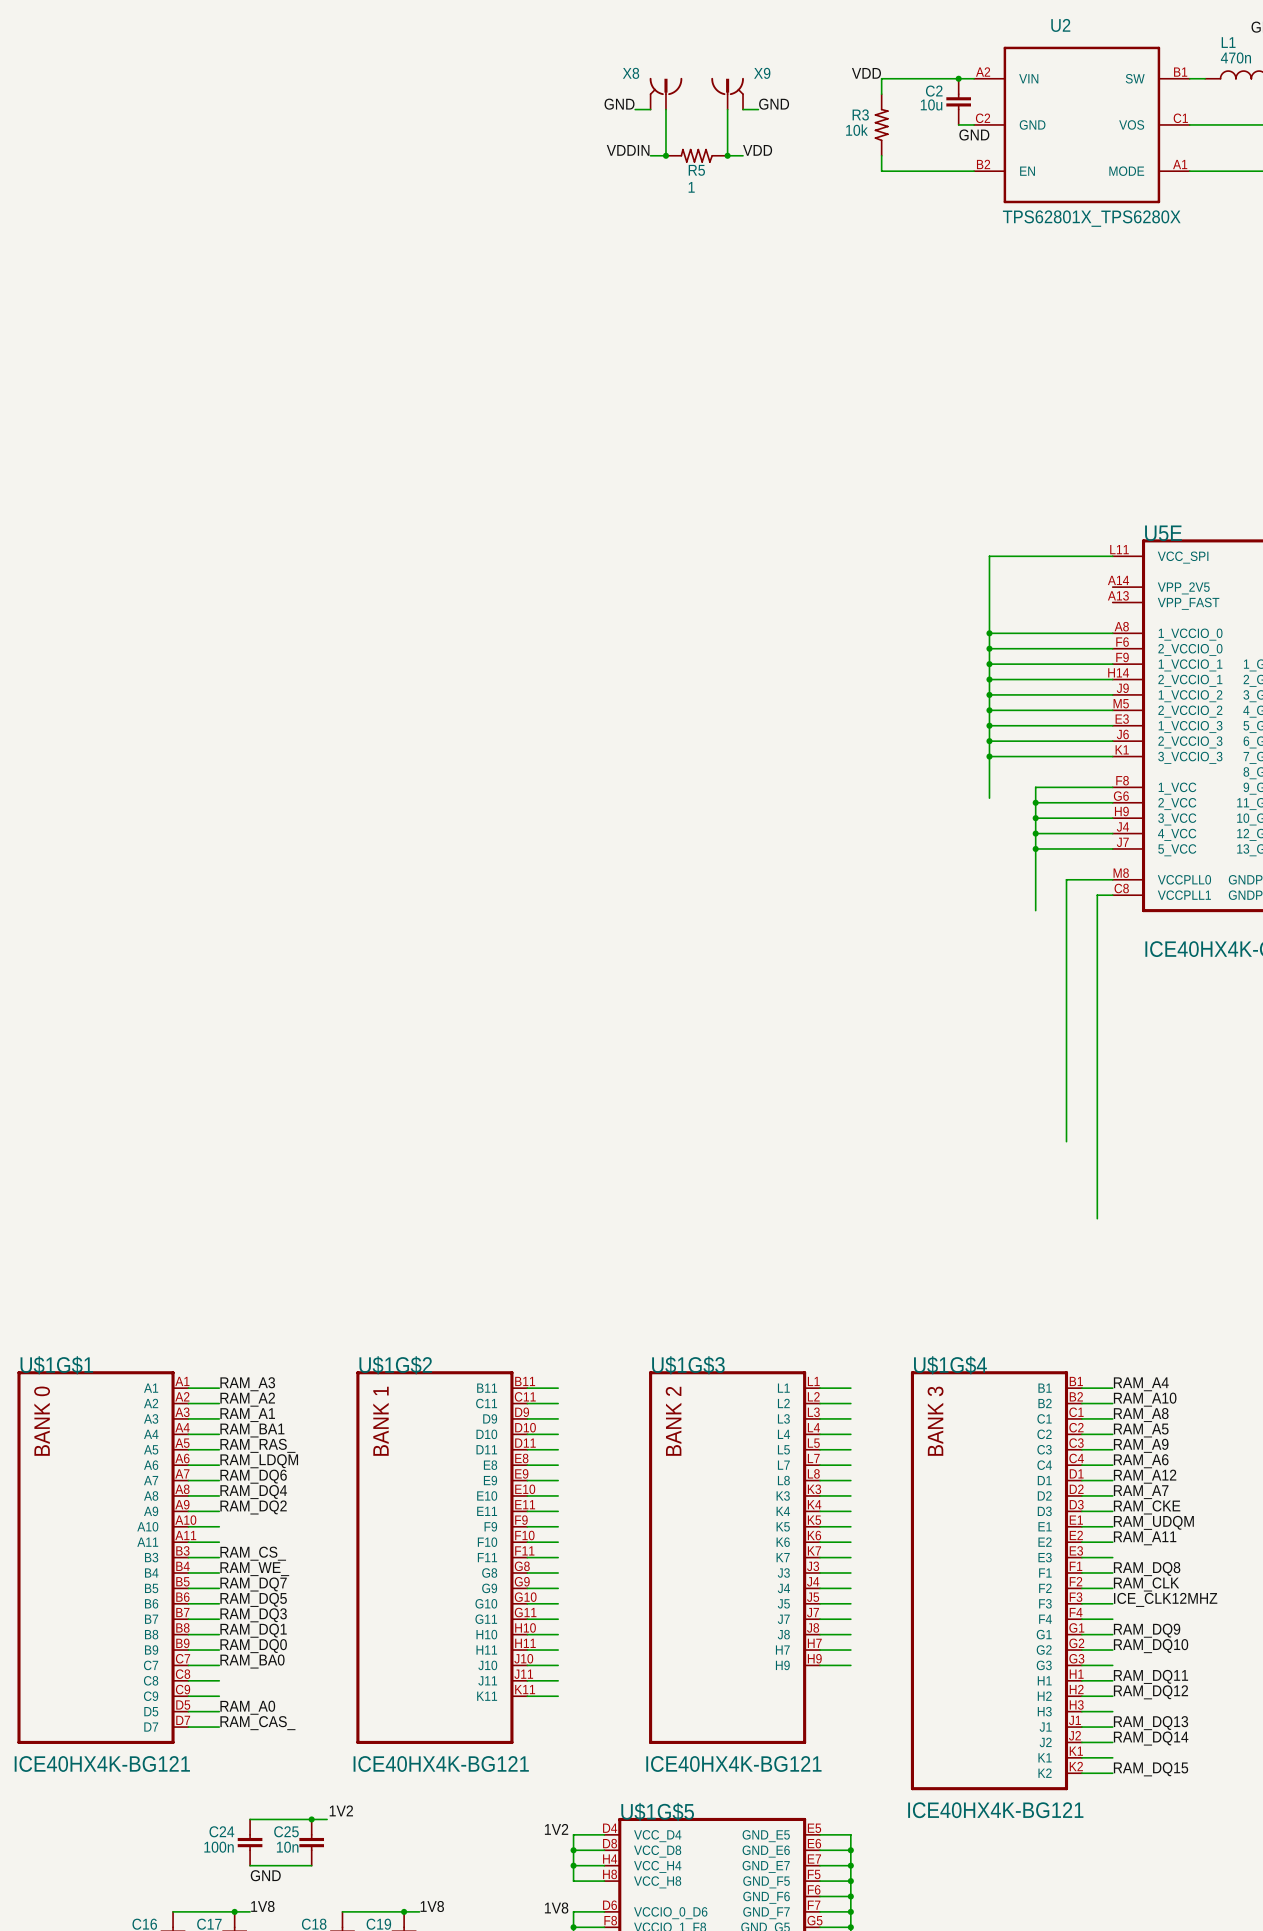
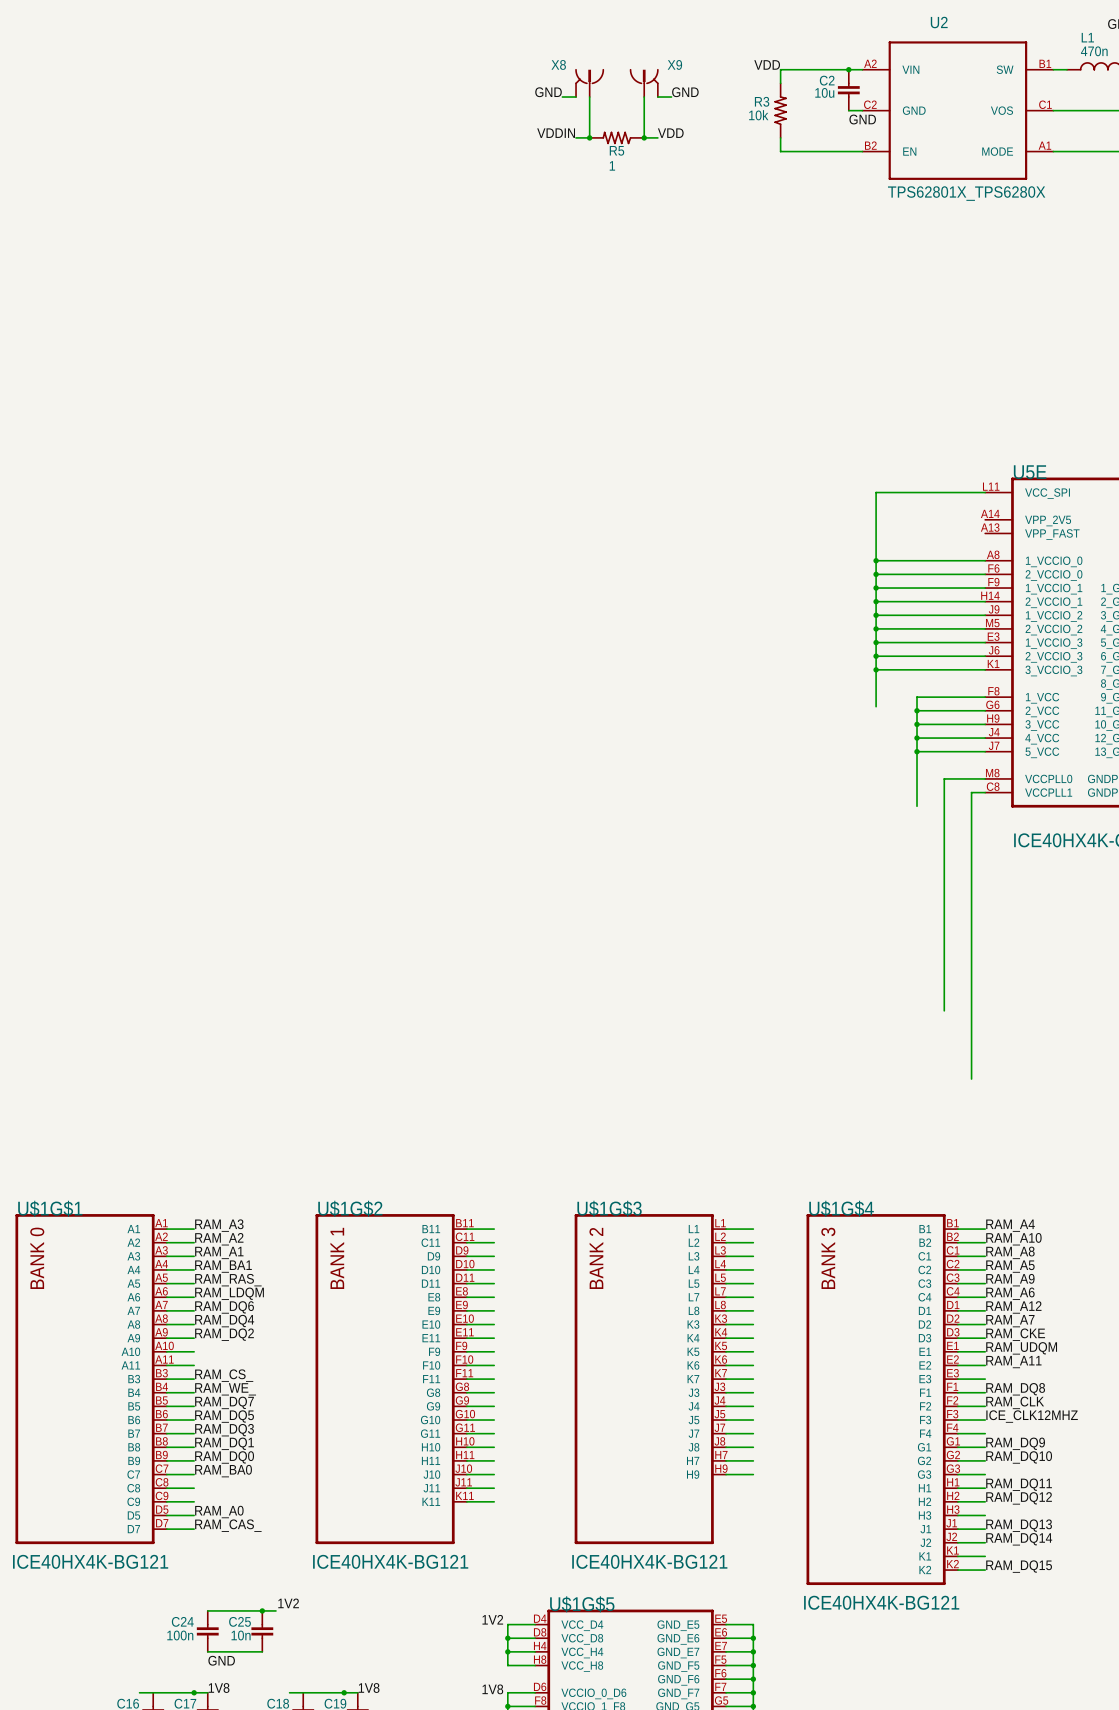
label position: 1V2 (341, 1810) -> 1V2 (288, 1603)
wire: (311, 1819) (327, 1819) -> (207, 1610) (221, 1610)
junction position: (311, 1819) -> (262, 1610)
C24 position: (250, 1842) -> (207, 1631)
C25 position: (311, 1842) -> (262, 1631)
wire: (296, 1865) (311, 1865) -> (207, 1651) (221, 1651)
label position: GND (265, 1875) -> GND (221, 1660)
label position: 1V8 (262, 1906) -> 1V8 (219, 1688)
label position: 1V8 (432, 1906) -> 1V8 (369, 1688)
wire: (234, 1911) (250, 1911) -> (139, 1692) (153, 1692)
junction position: (234, 1911) -> (194, 1692)
wire: (404, 1911) (419, 1911) -> (289, 1692) (303, 1692)
junction position: (404, 1911) -> (344, 1692)

